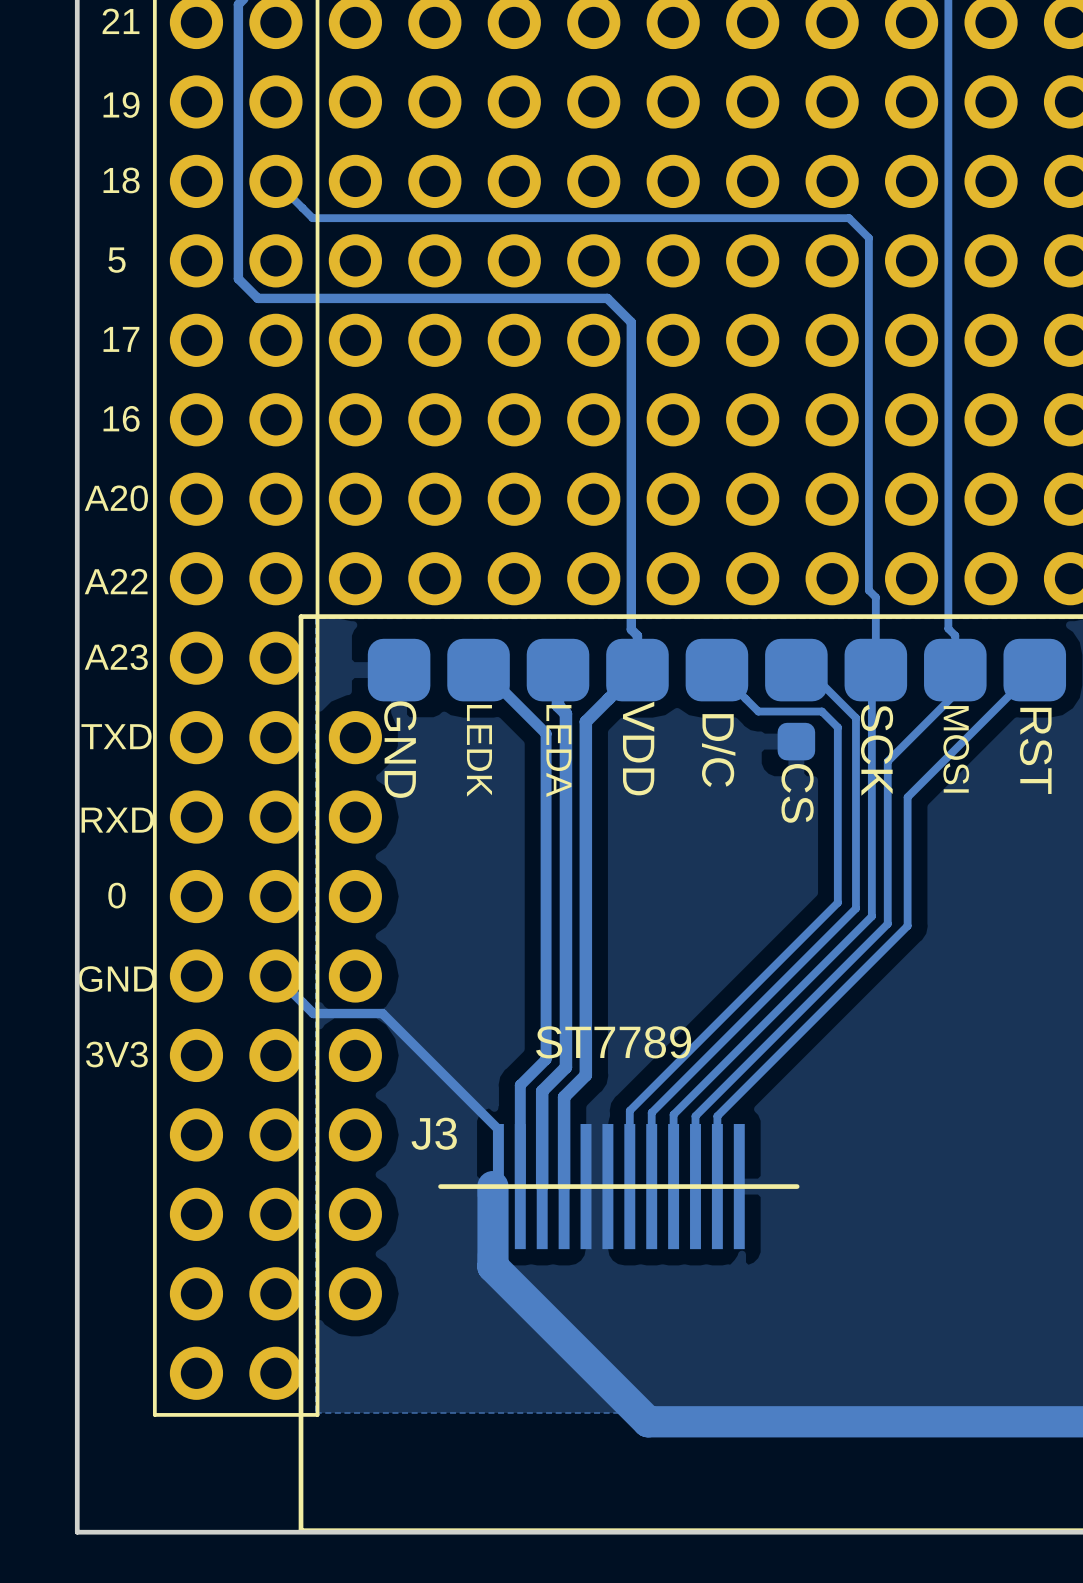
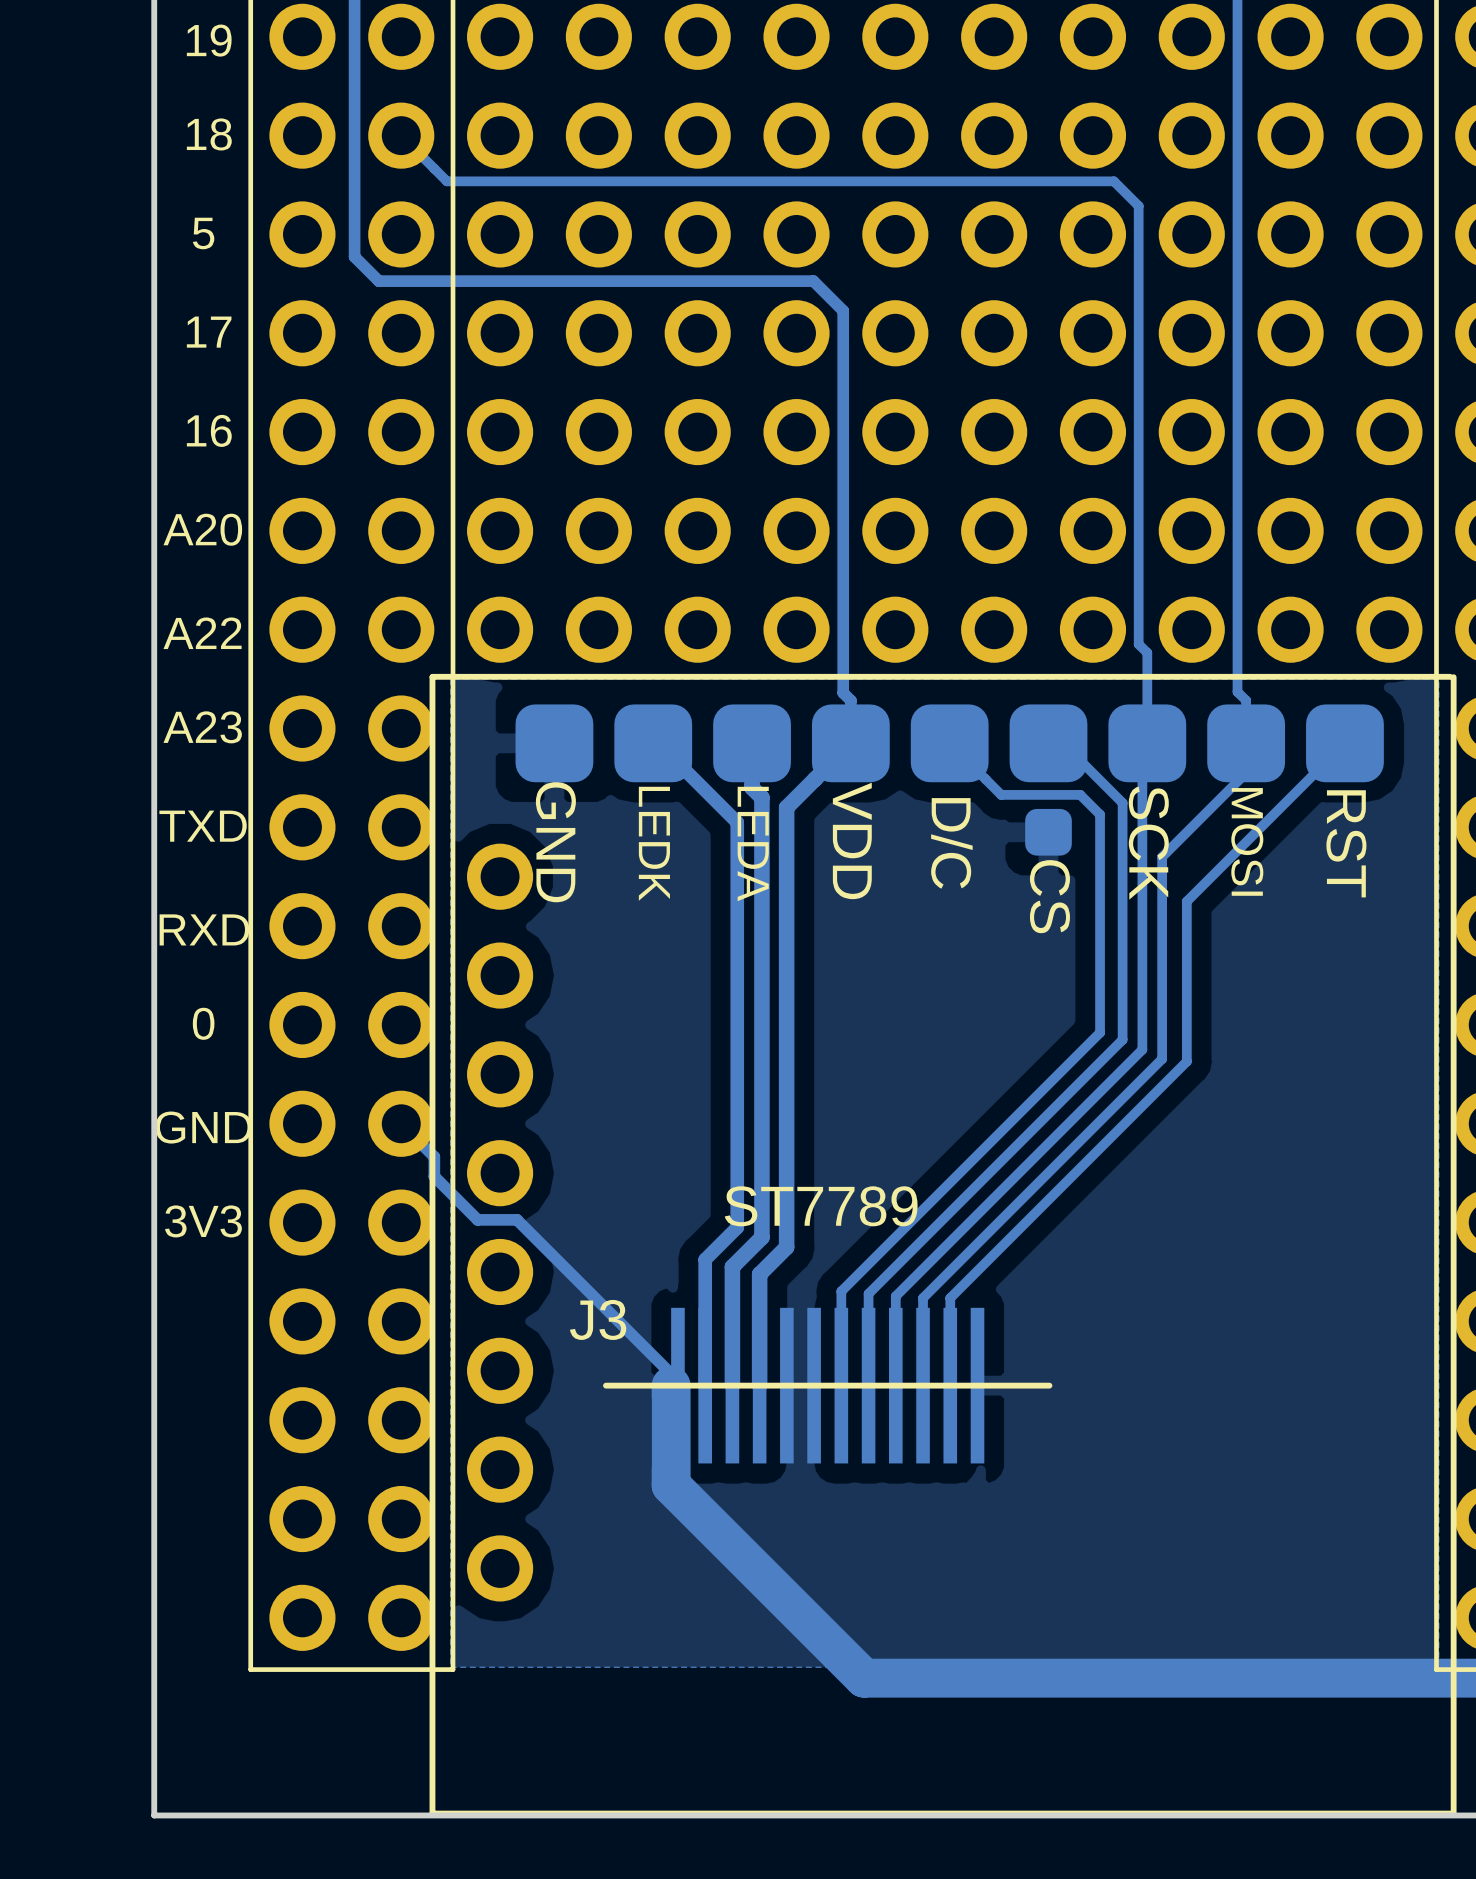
track: (302, 1002) (313, 1013) (382, 1013) (498, 1129) (498, 1186) -> (434, 1156) (434, 1176) (477, 1219) (517, 1219) (671, 1373) (671, 1385)
part position: (355, 1015) -> (500, 1222)

